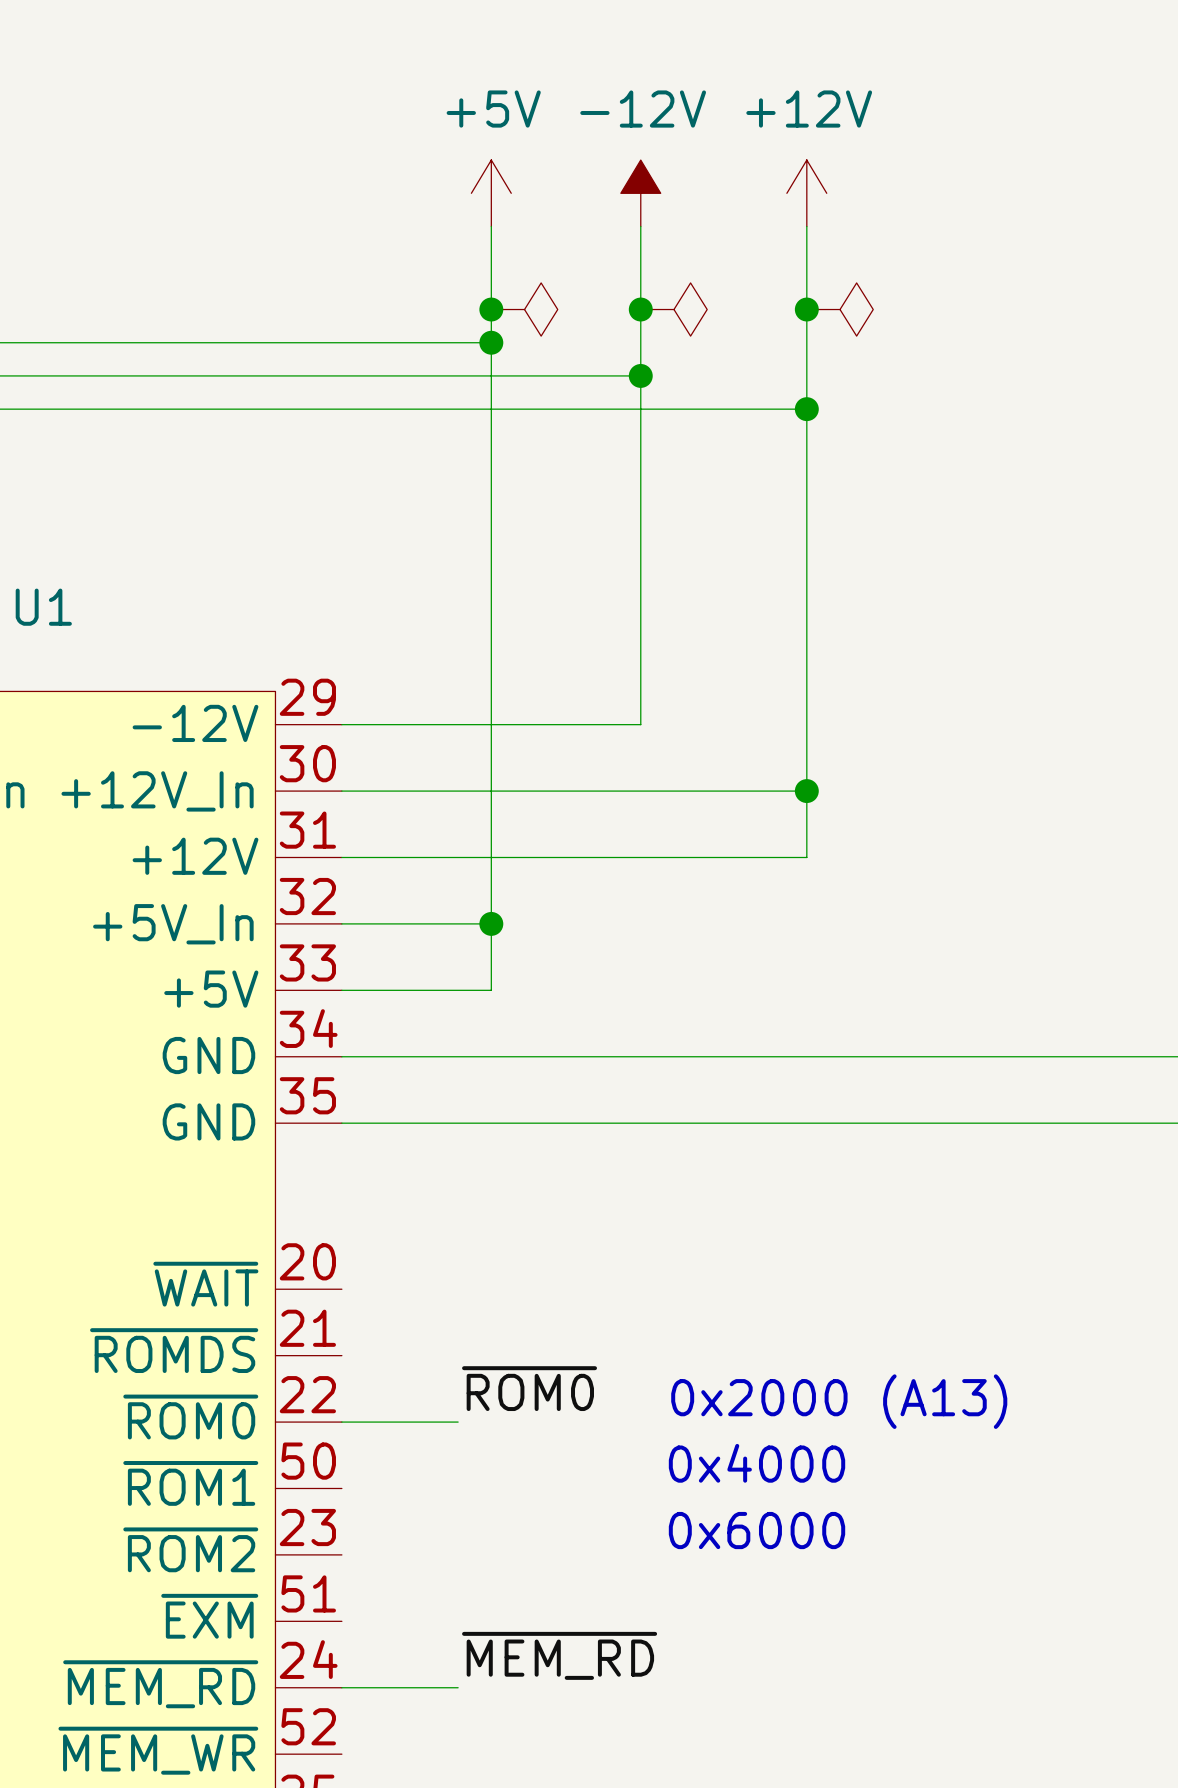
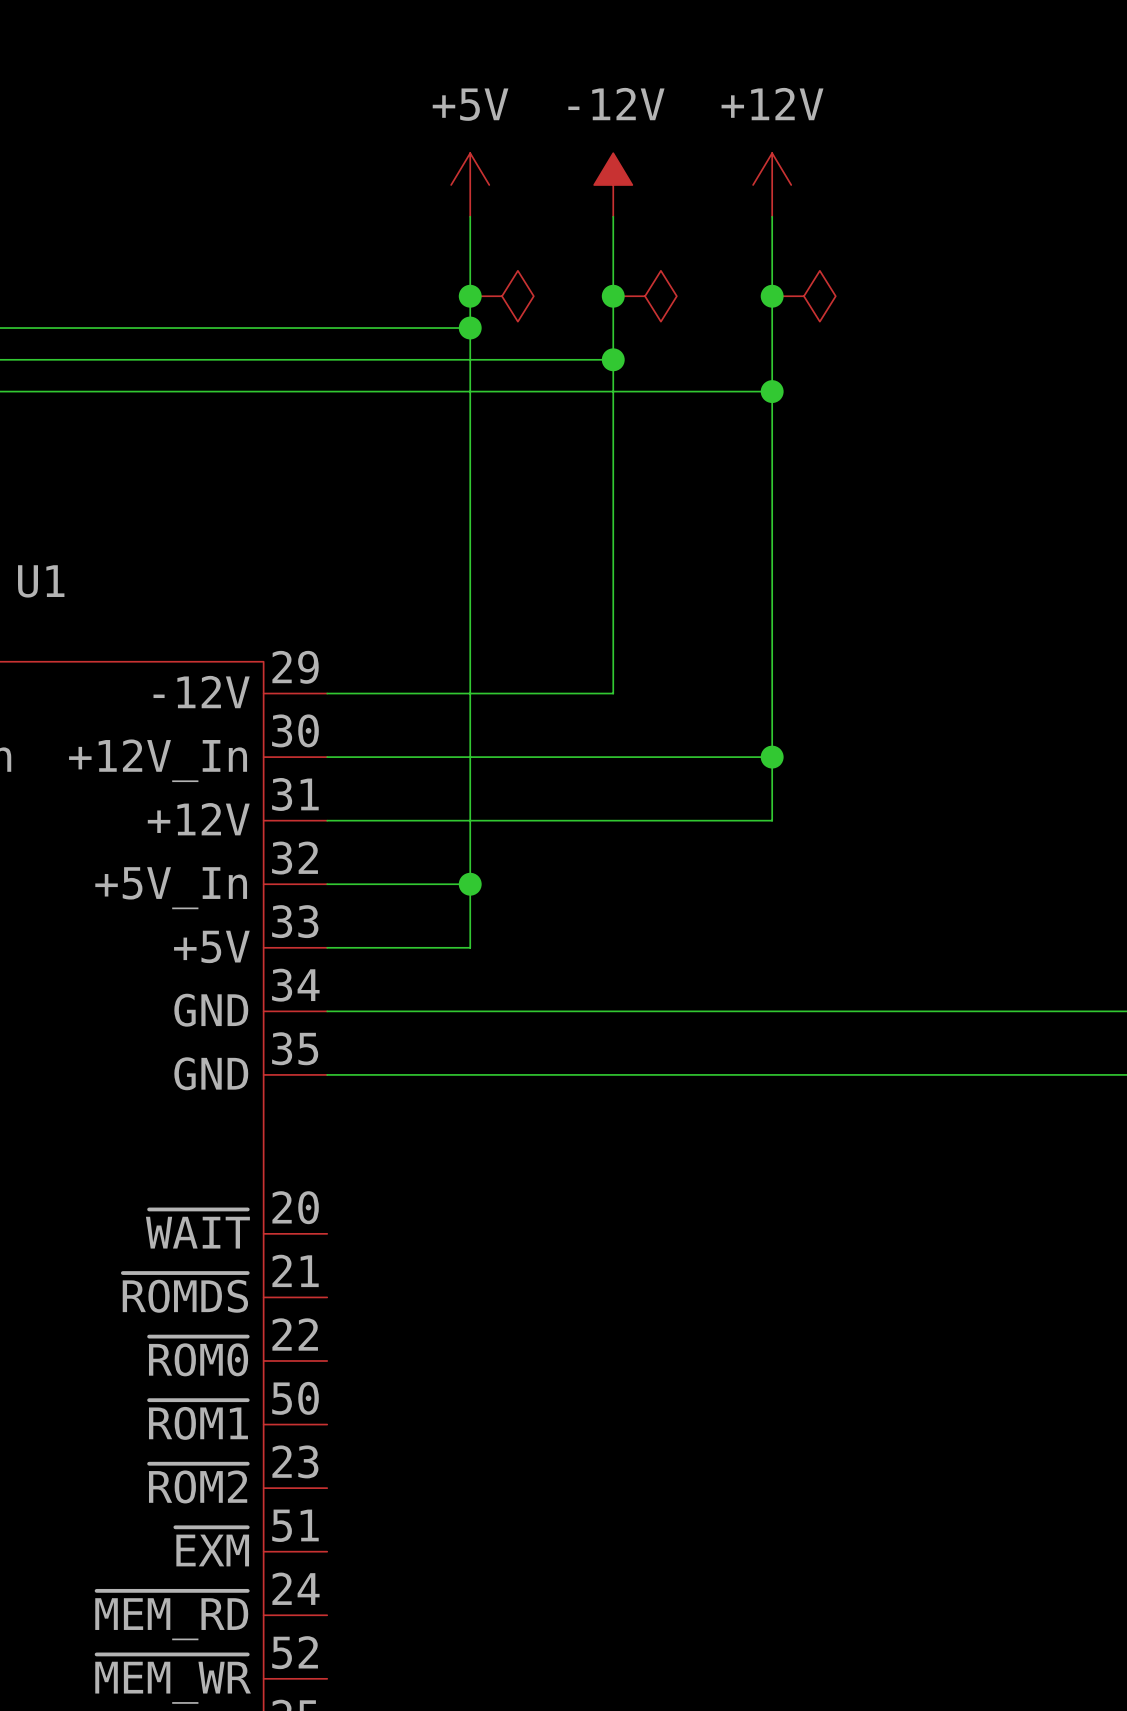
label: ~{ROM0} (529, 1388) -> none
text: 0x2000 (A13) (839, 1401) -> none
wire: (341, 1422) (458, 1422) -> none
text: 0x4000 (757, 1463) -> none
text: 0x6000 (757, 1530) -> none
label: ~{MEM_RD} (559, 1655) -> none
wire: (341, 1687) (458, 1687) -> none

